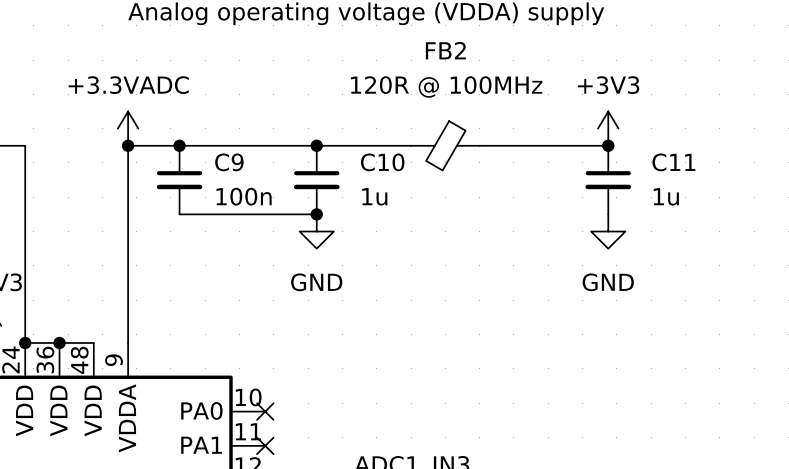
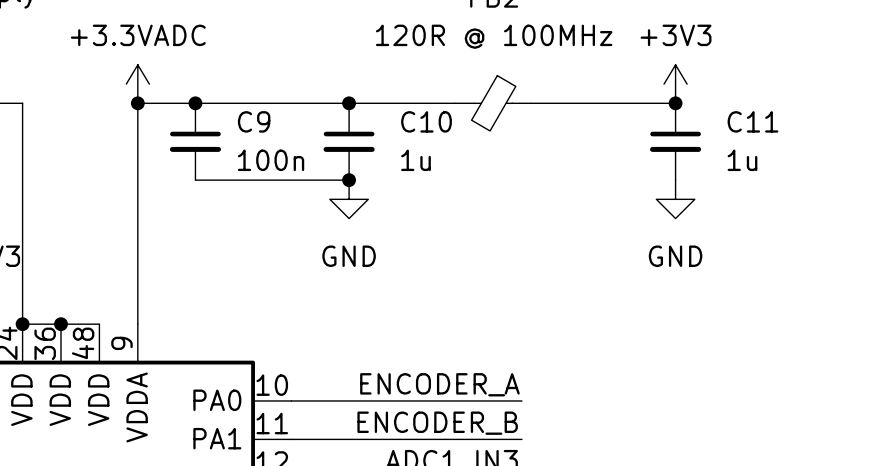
label: none -> ENCODER_A (439, 384)
wire: none -> (291, 400) (521, 400)
no-connect mark: (265, 411) -> none
label: none -> ENCODER_B (437, 423)
wire: none -> (291, 439) (521, 439)
no-connect mark: (265, 445) -> none

